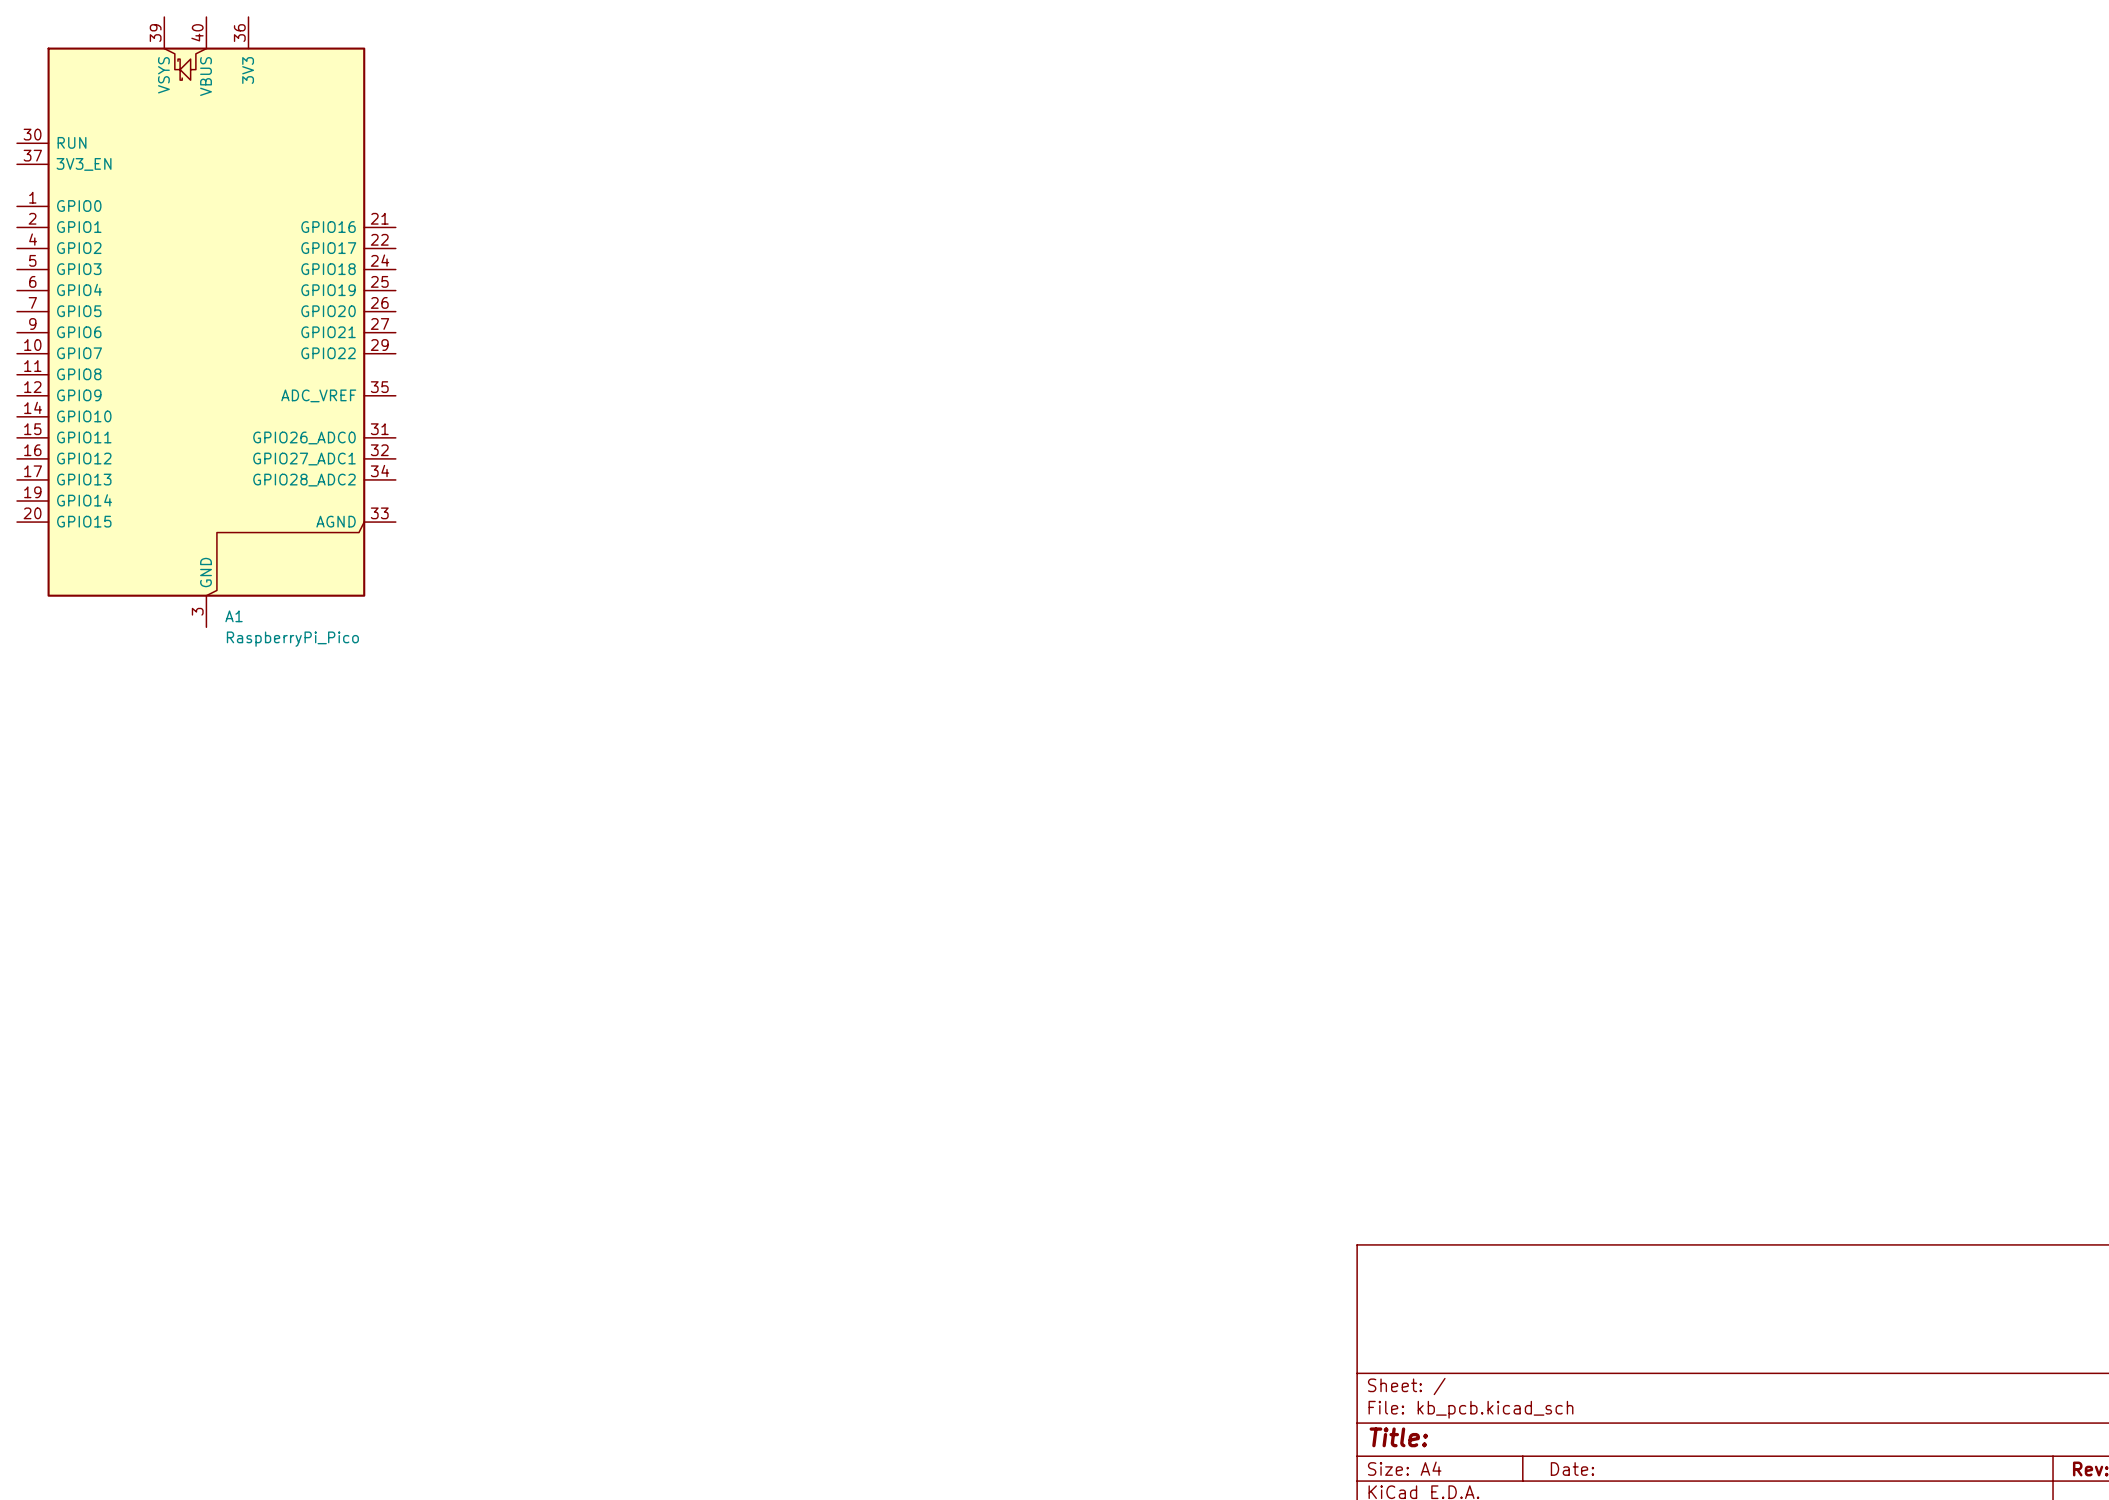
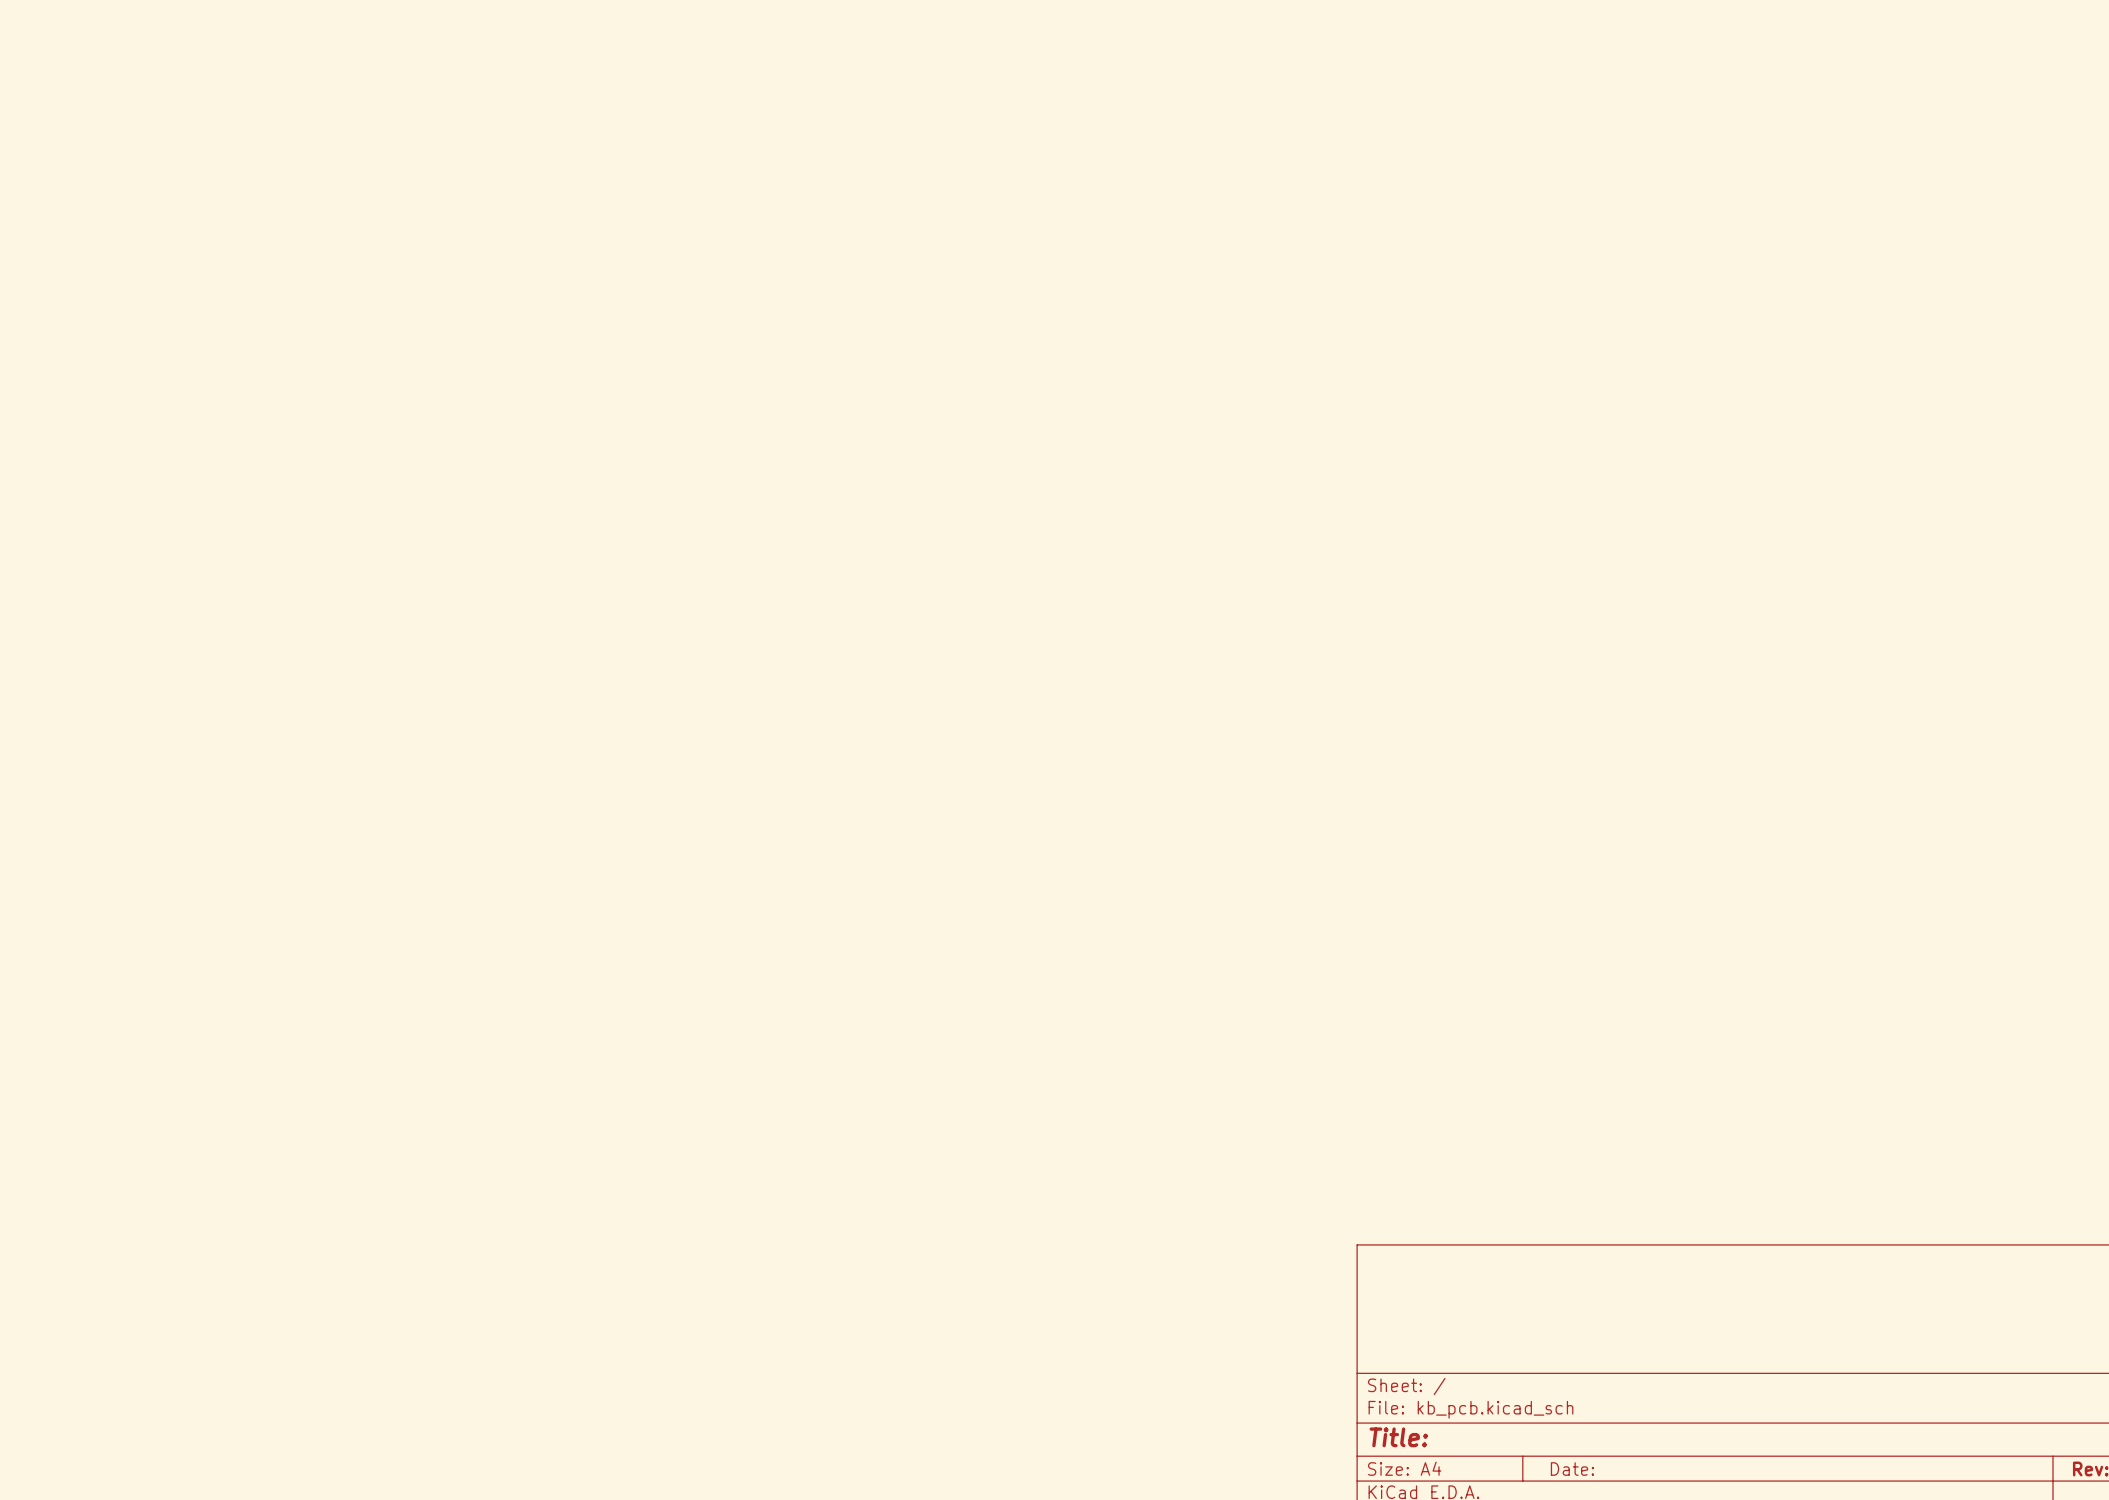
A1: RaspberryPi_Pico (206, 322) -> none

